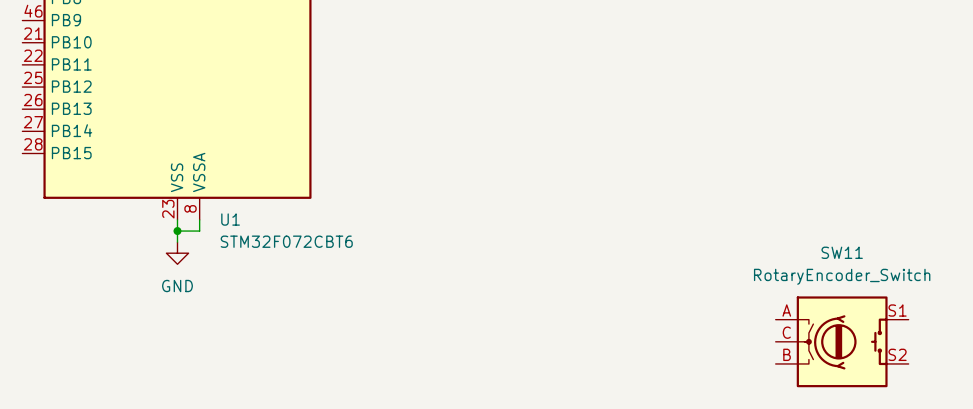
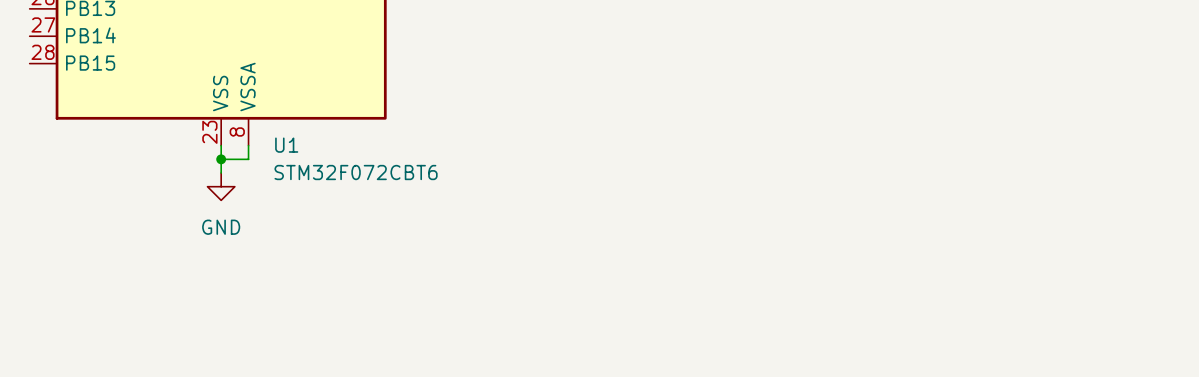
SW11: RotaryEncoder_Switch (842, 341) -> none

